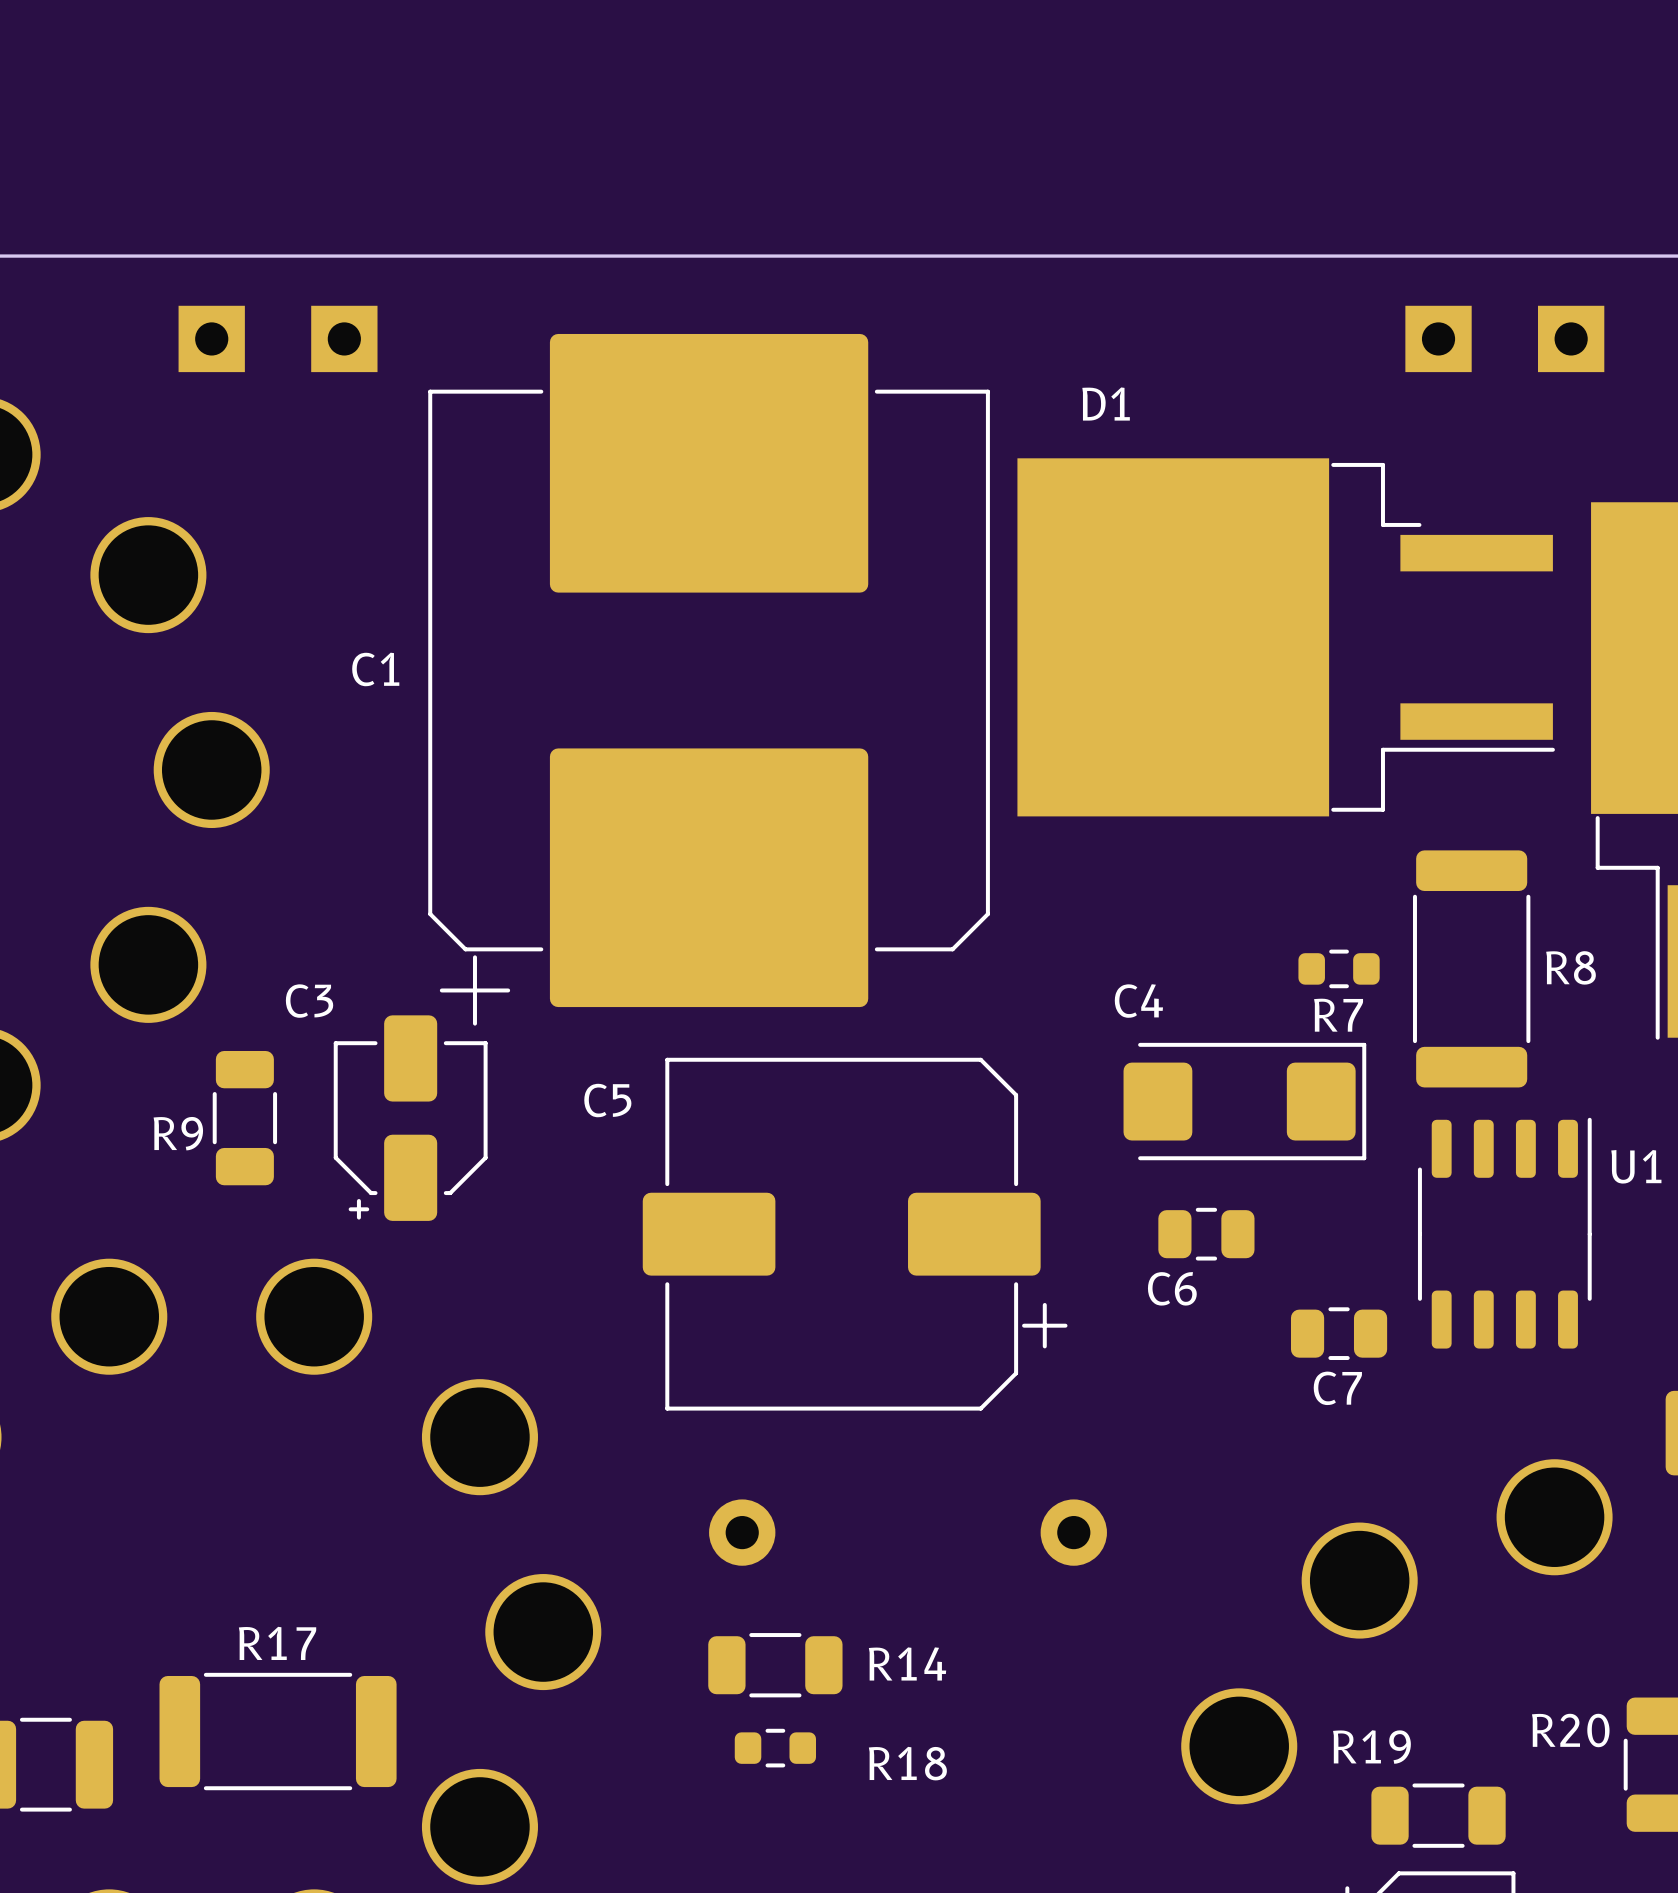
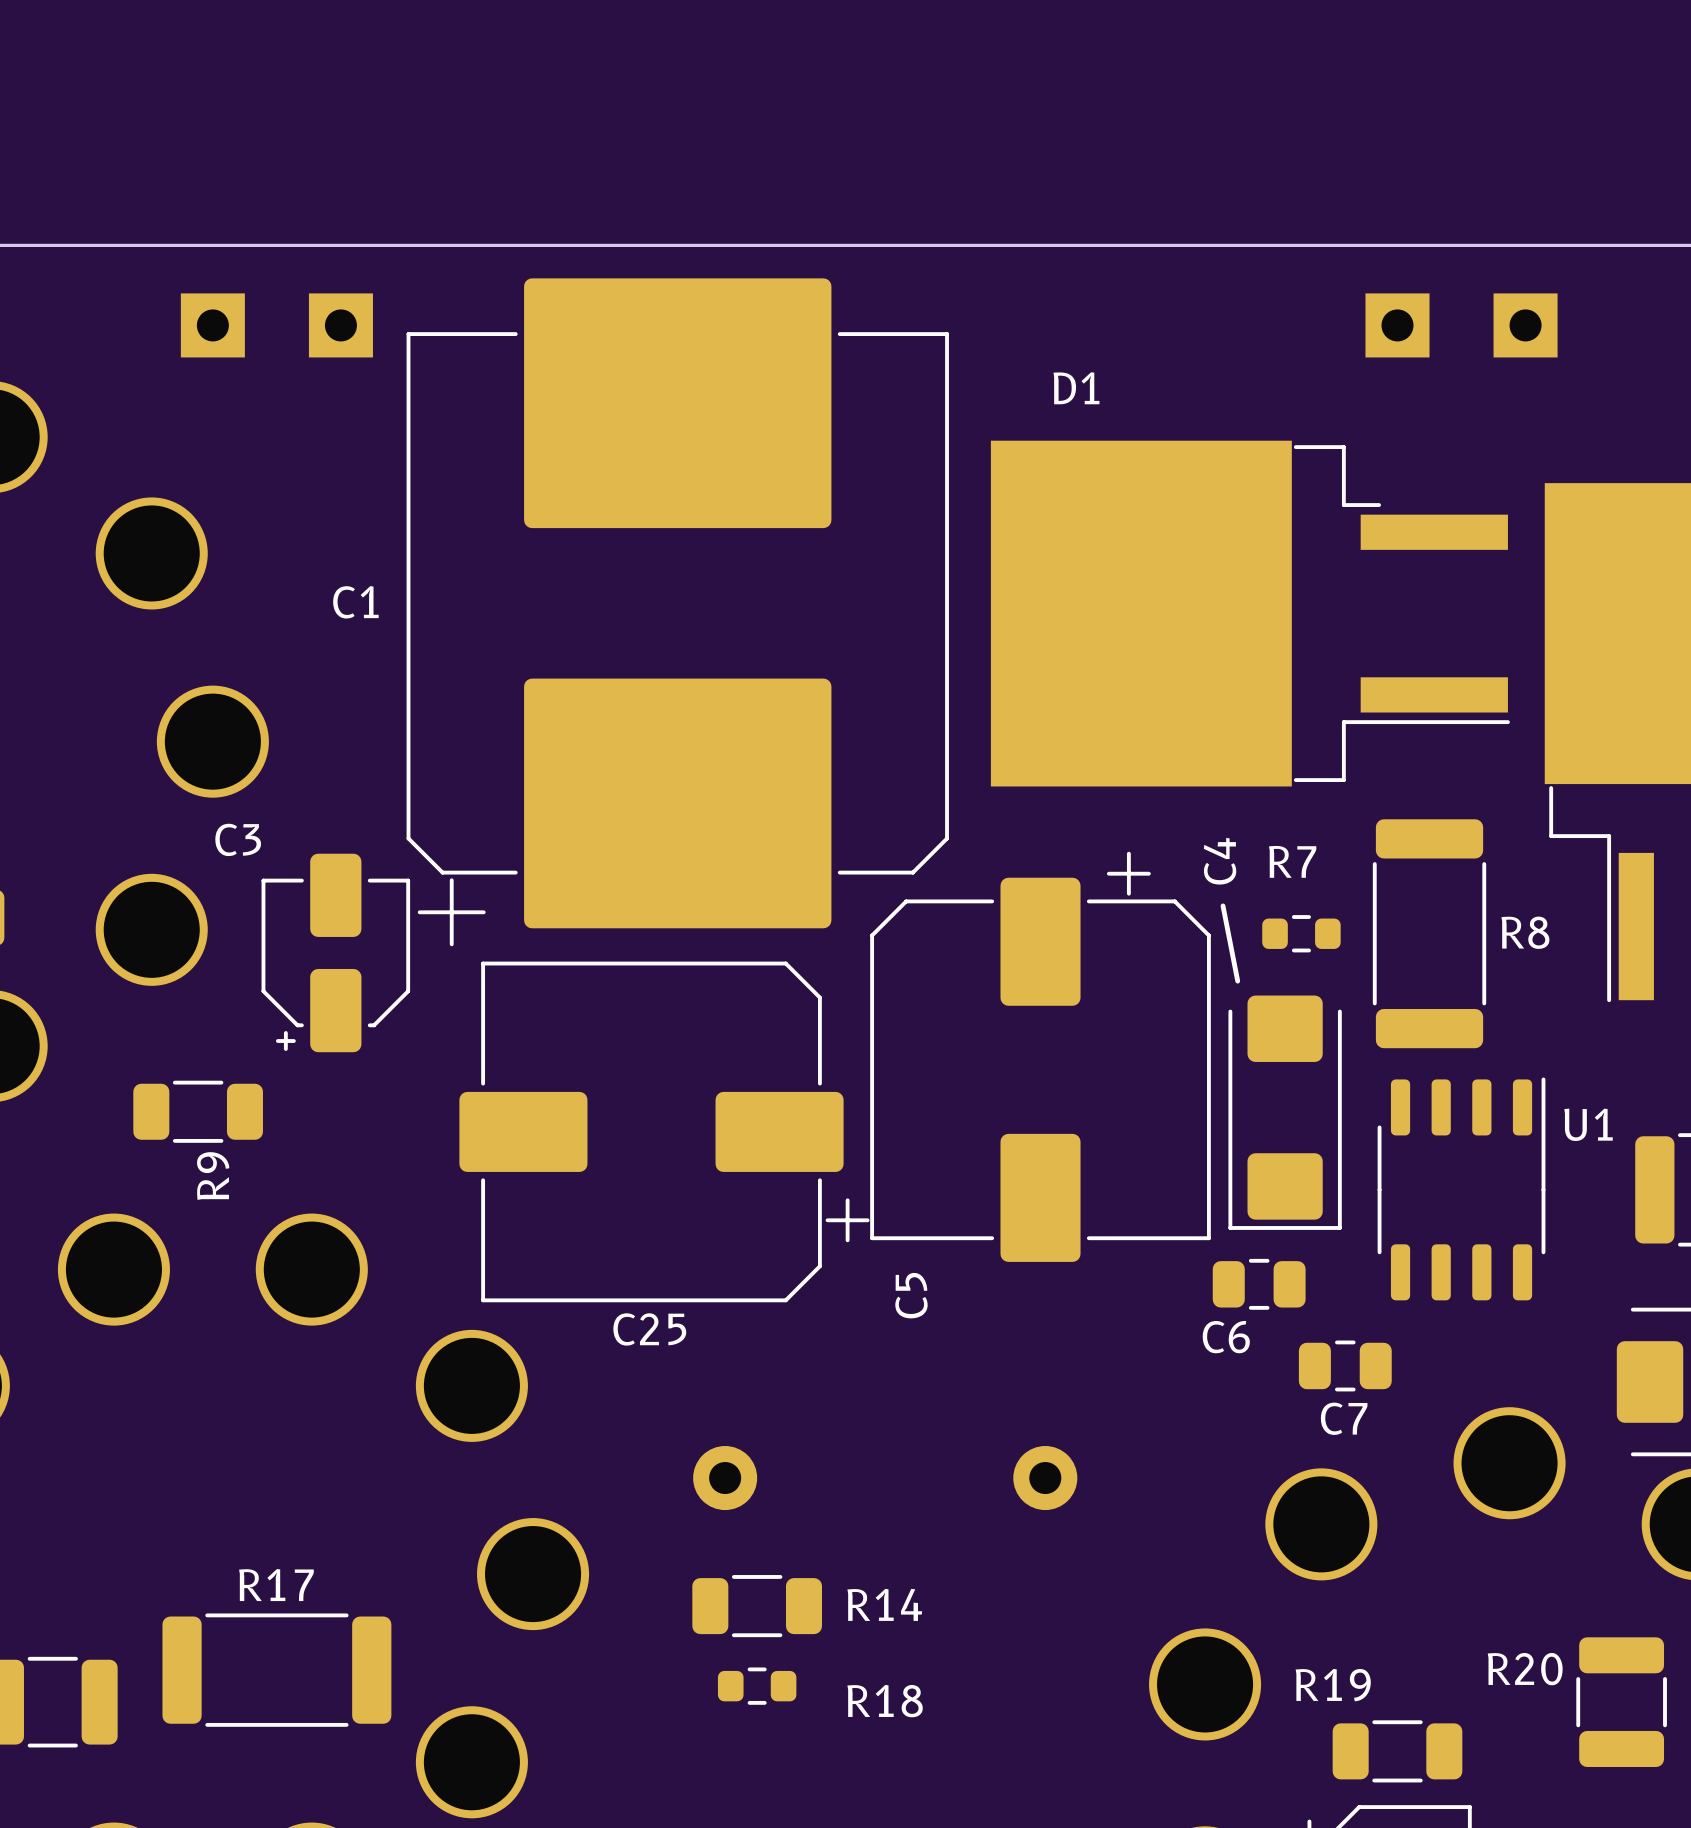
C1 position: (709, 679) -> (677, 612)
line: none -> (1223, 905) (1237, 981)
C4 name position: C4 (1138, 1001) -> C4 (1220, 861)
R7 name position: R7 (1338, 1015) -> R7 (1292, 861)
C4 rotation: 0° (1244, 1101) -> 90° clockwise (1285, 1112)
R9 rotation: 0° (244, 1118) -> 90° clockwise (198, 1111)
C3 position: (410, 1118) -> (335, 952)
R9 name position: R9 (178, 1133) -> R9 (213, 1176)
C25: none -> (664, 1131)
C5 rotation: 0° (855, 1234) -> 90° counterclockwise (1040, 1056)
C6 position: (1206, 1234) -> (1259, 1284)
C7 position: (1339, 1333) -> (1345, 1365)

